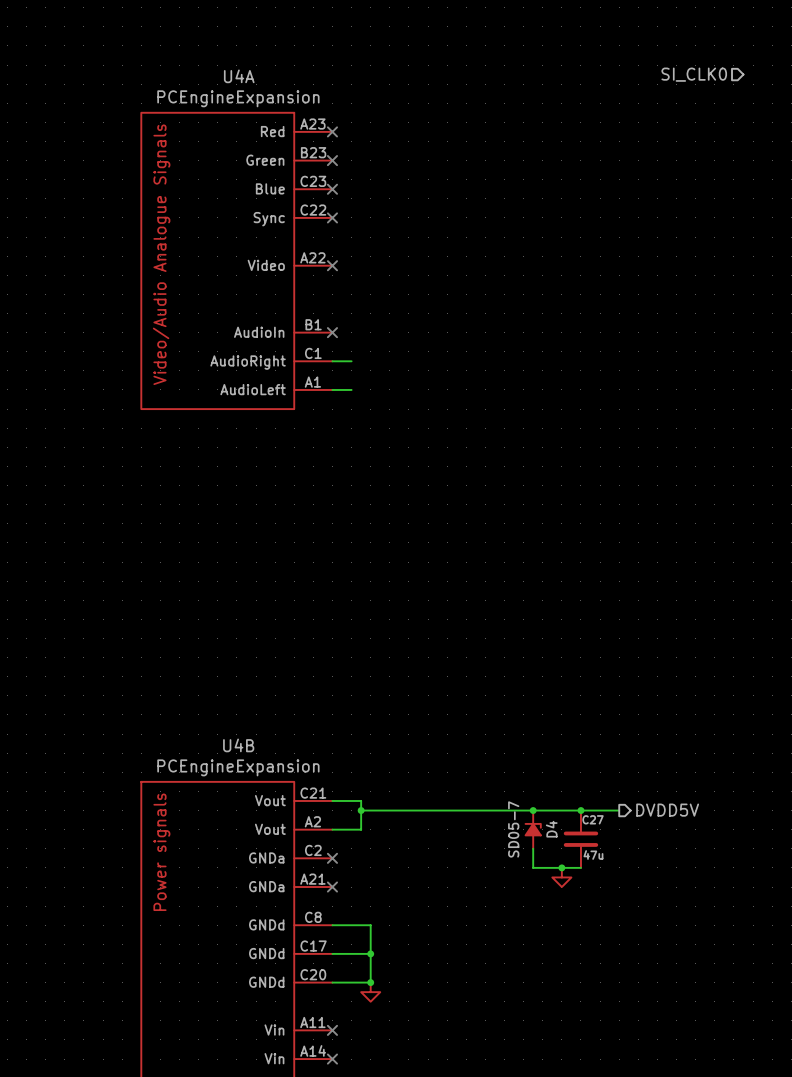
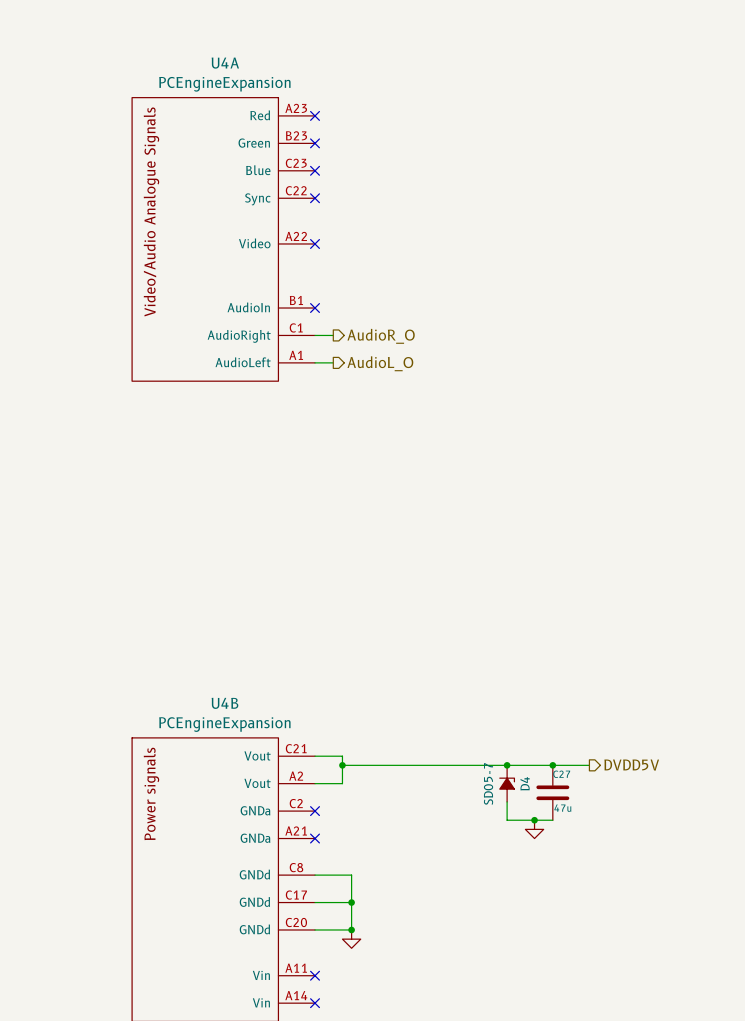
hierarchical label: SI_CLK0 (694, 74) -> none
hierarchical label: none -> AudioR_O (381, 336)
hierarchical label: none -> AudioL_O (380, 363)

